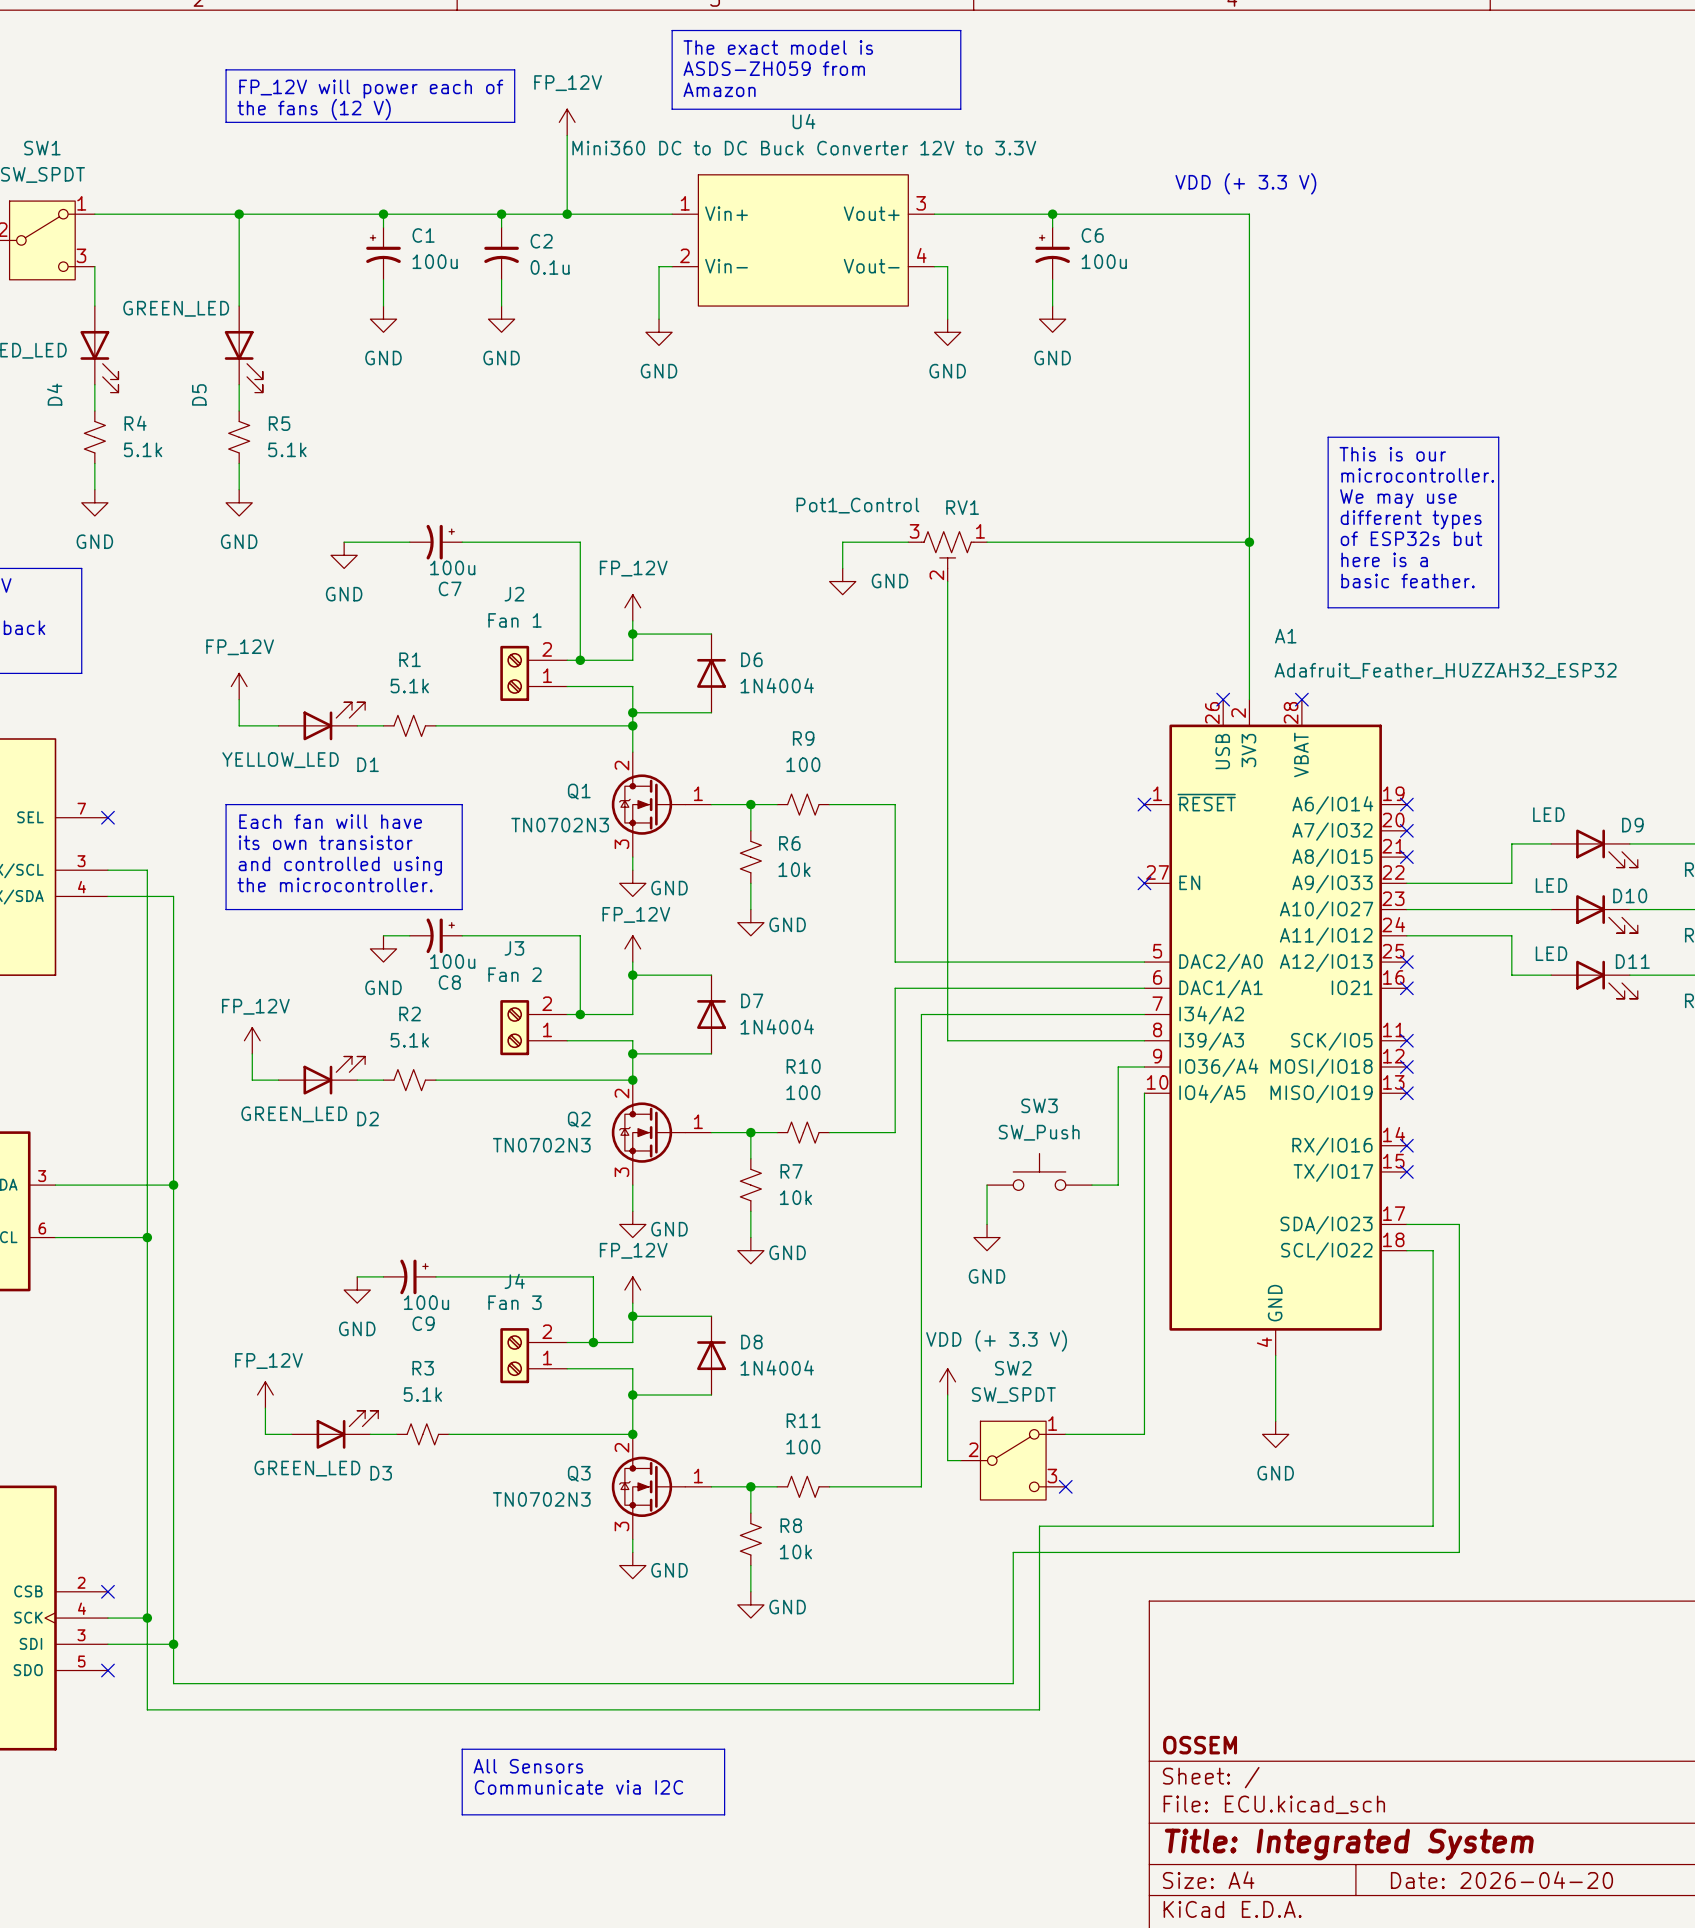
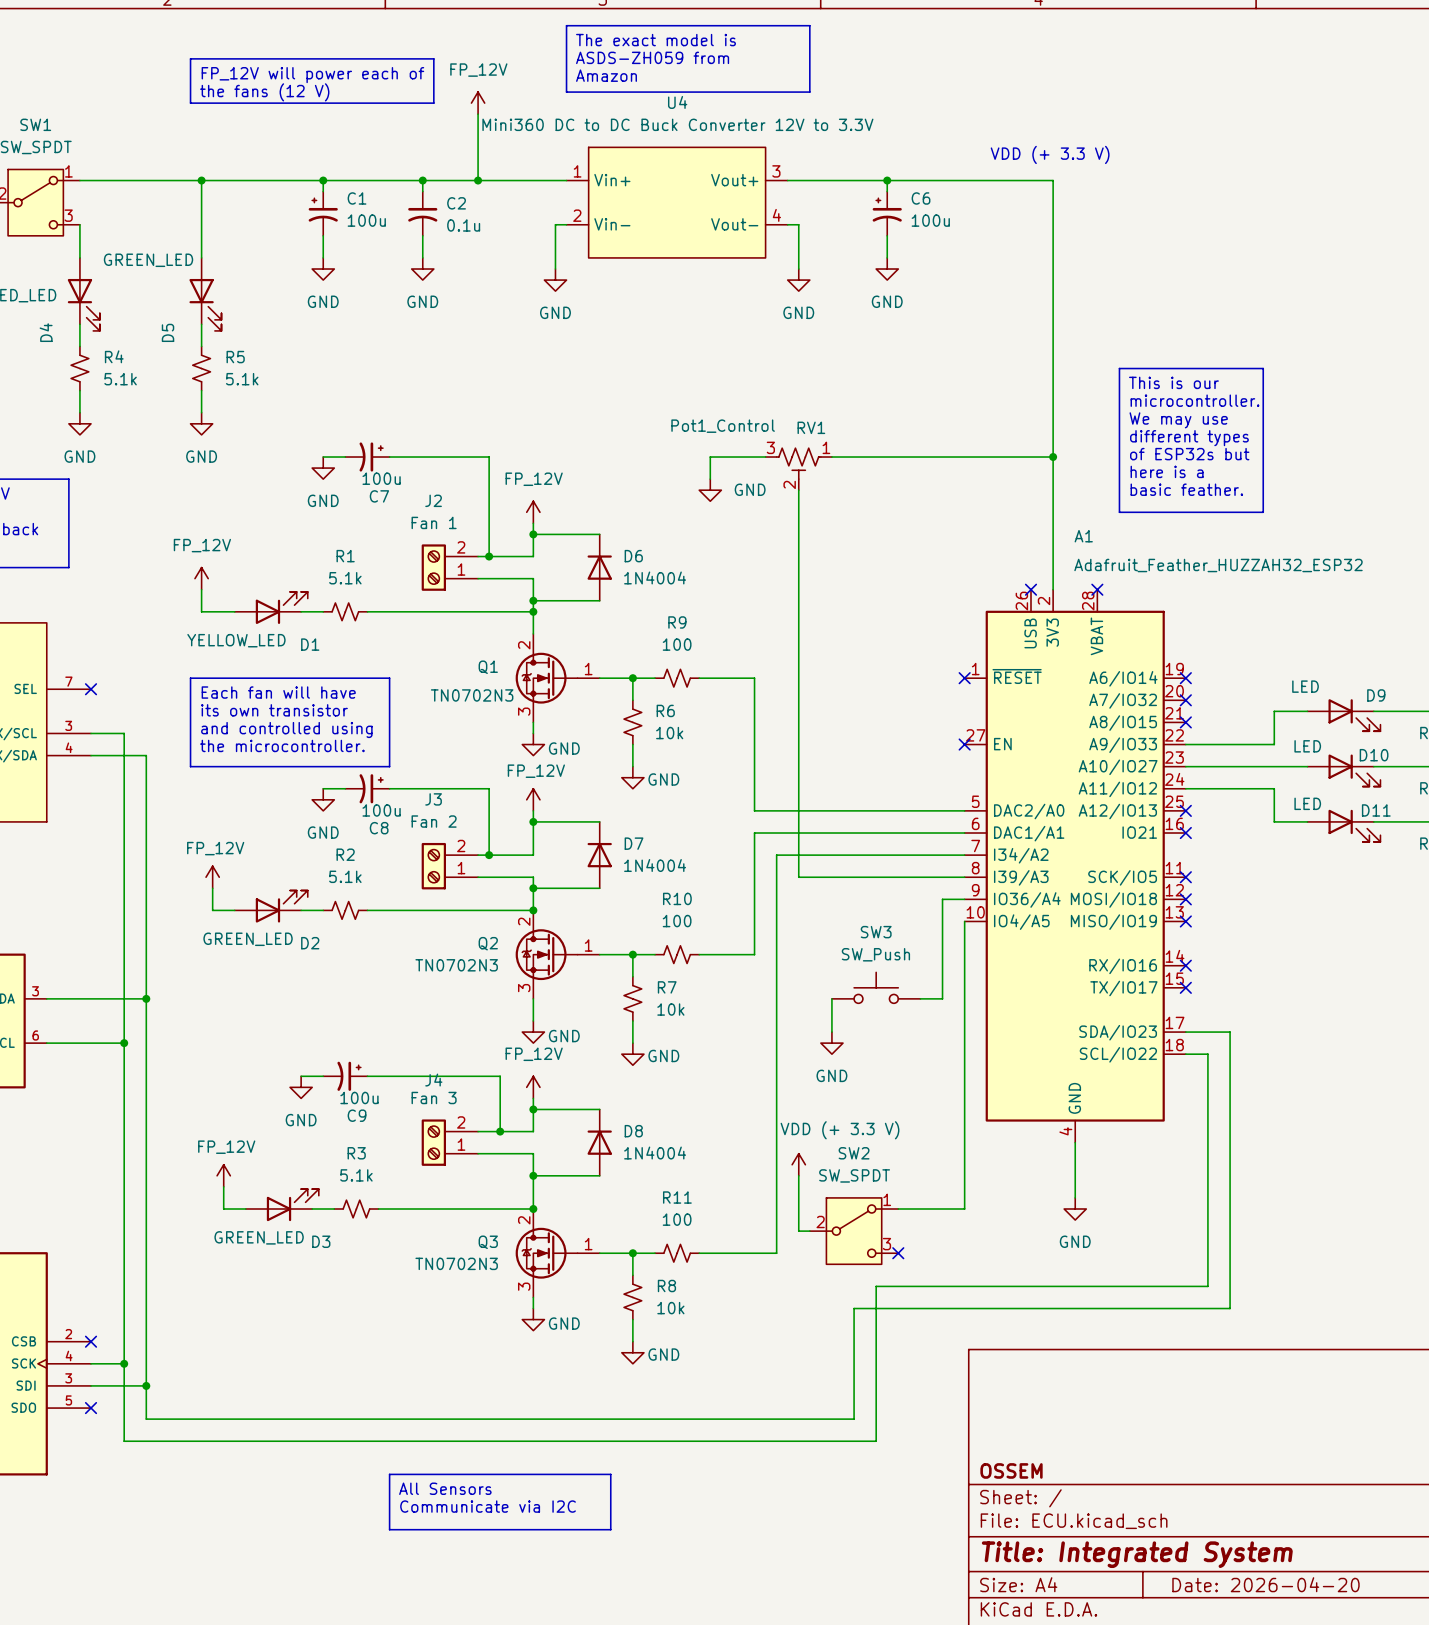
wire: (344, 542) (383, 542) -> none
power symbol position: GND (344, 555) -> GND (323, 468)

